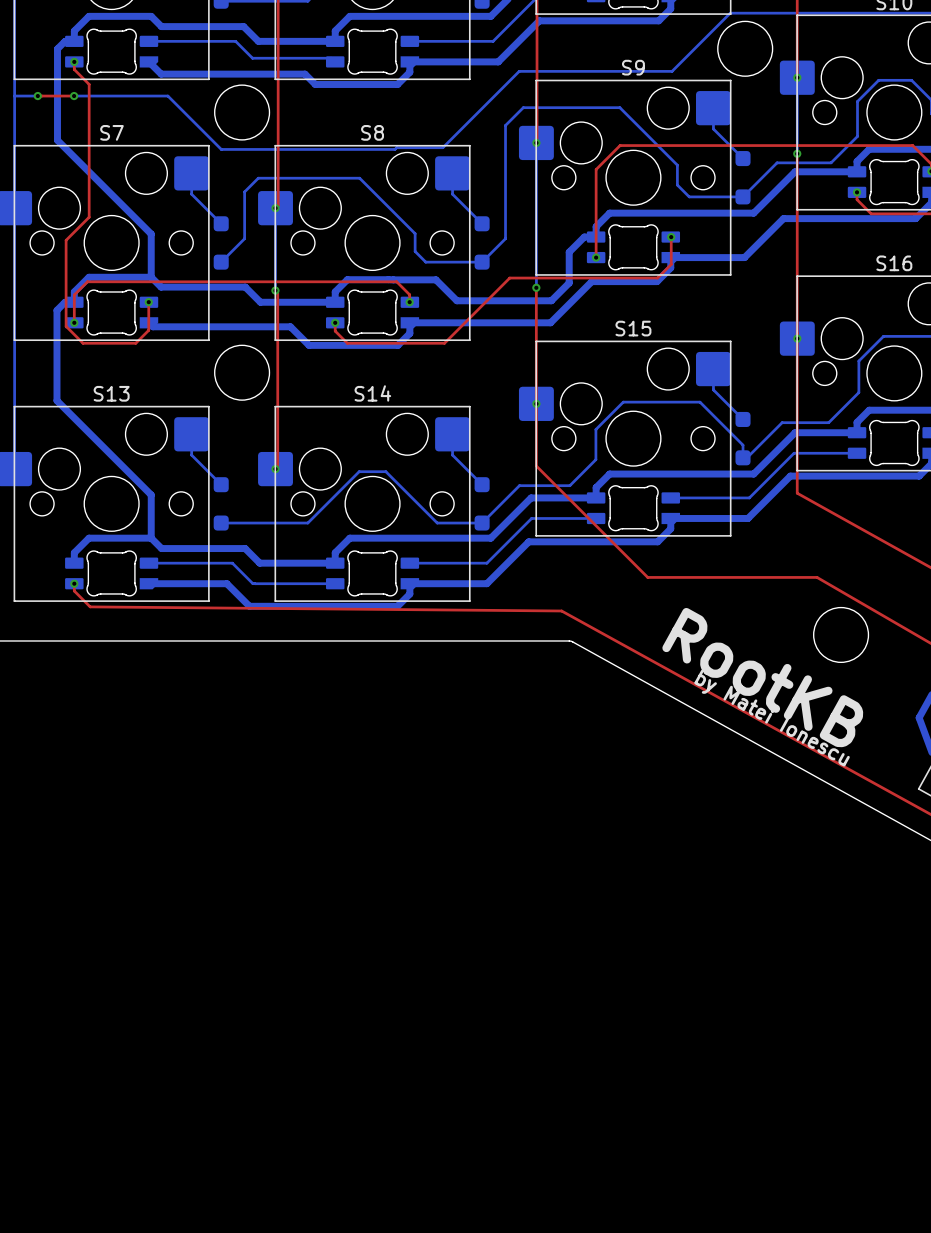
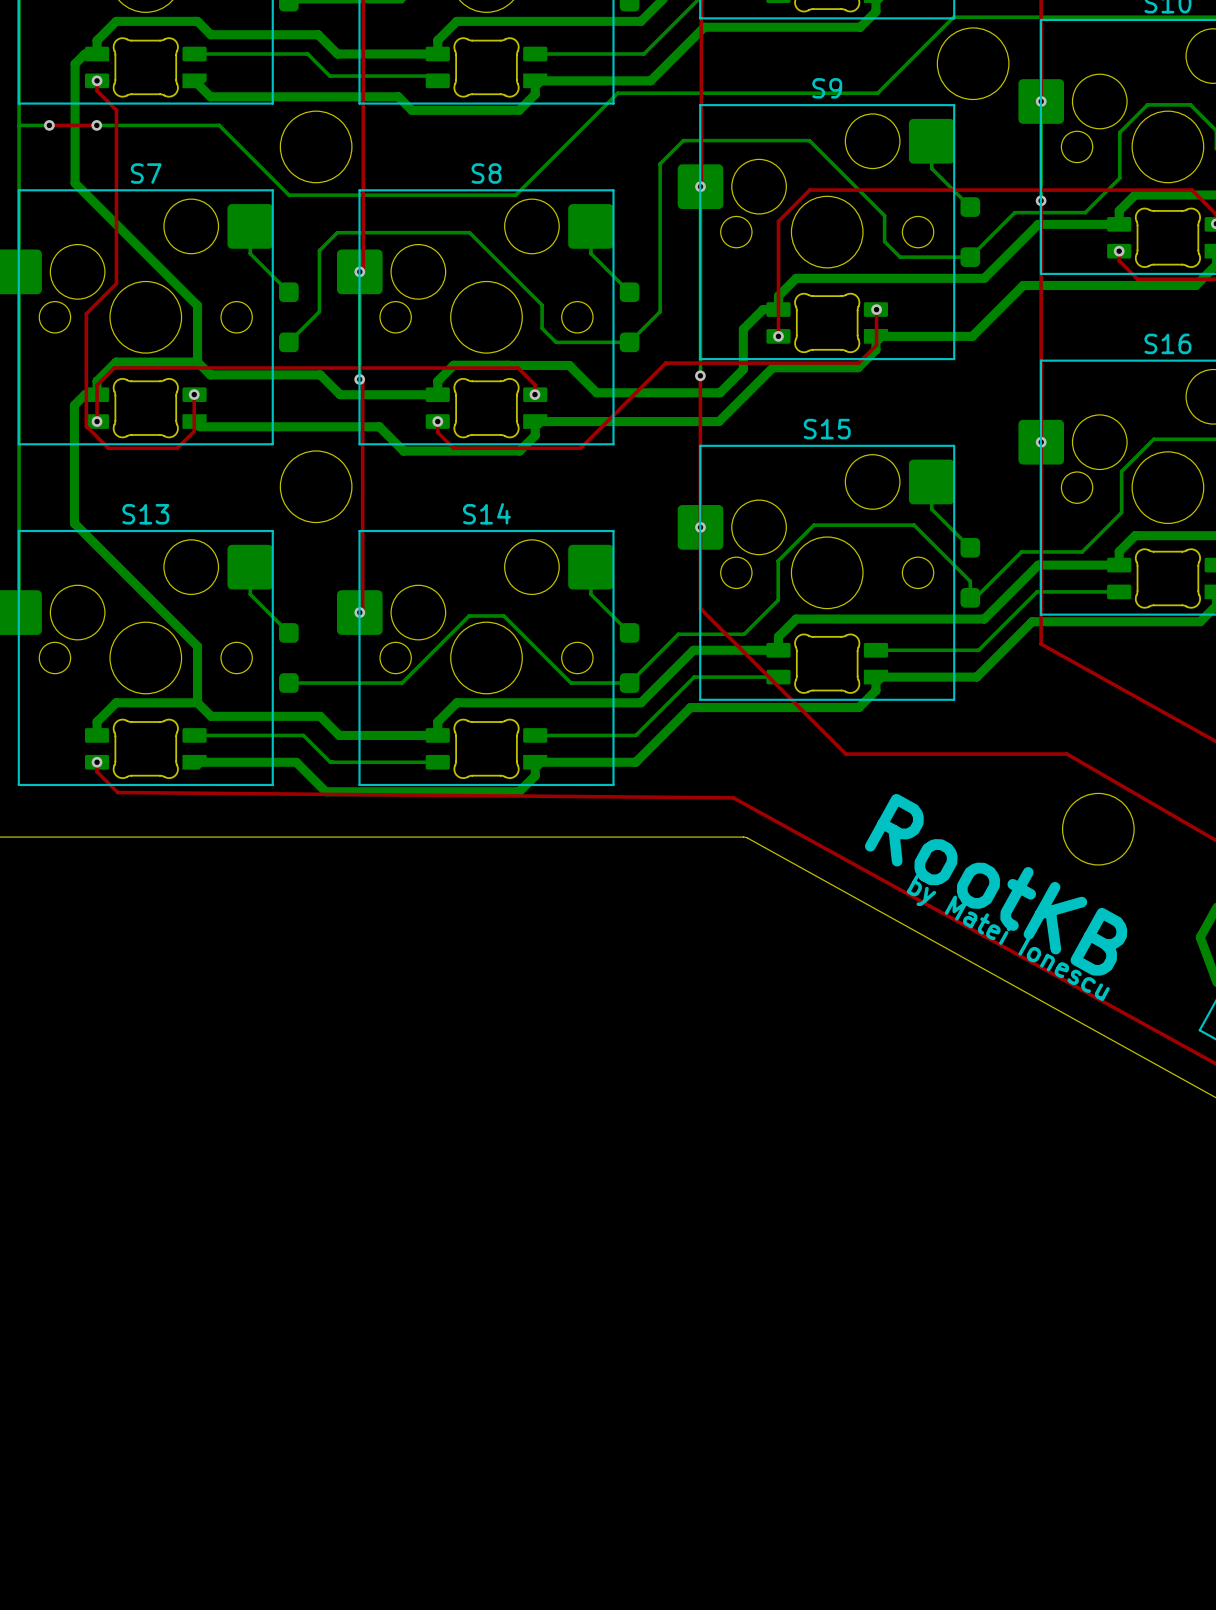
bottom track: (519, 71) (442, 147) (396, 147) -> (678, 93) (617, 93) (518, 192)

